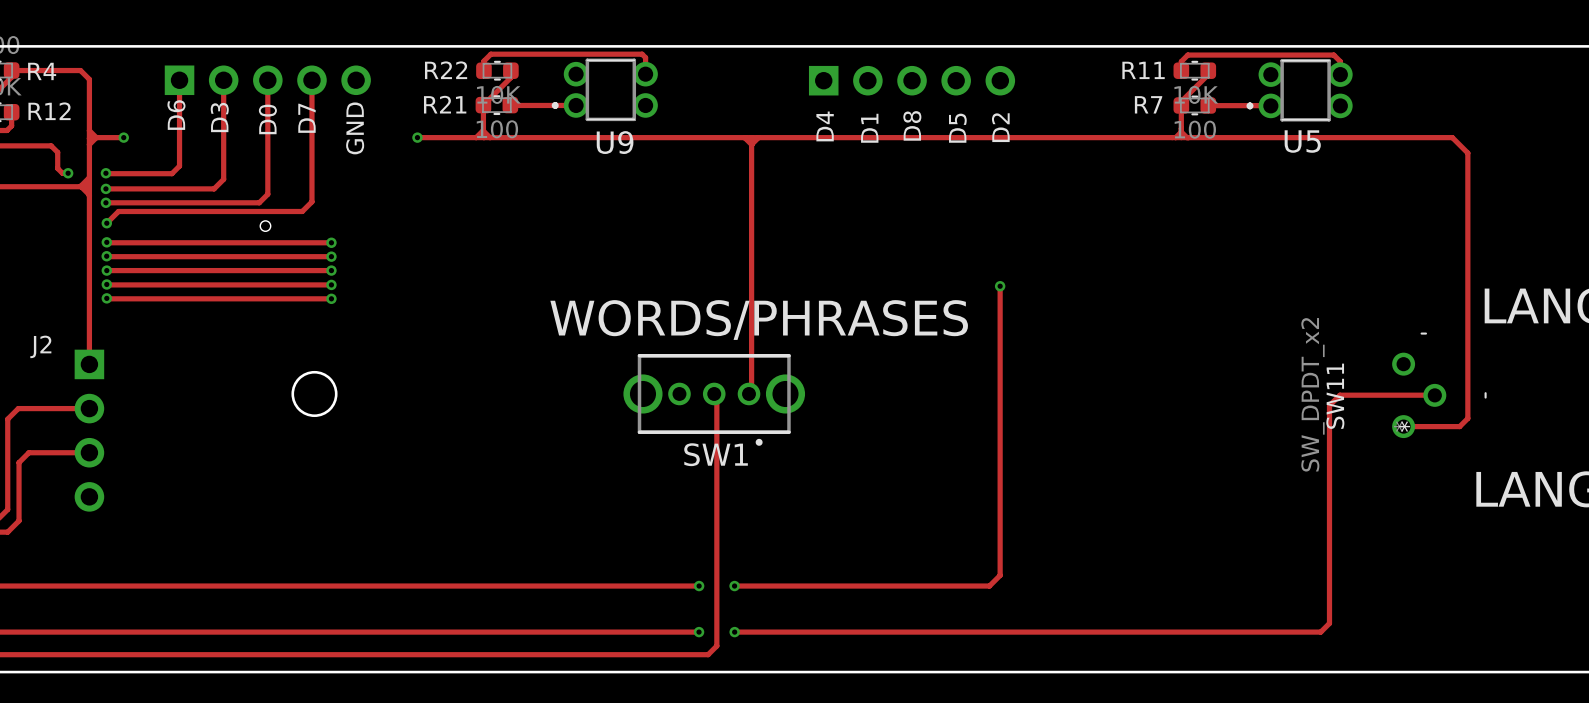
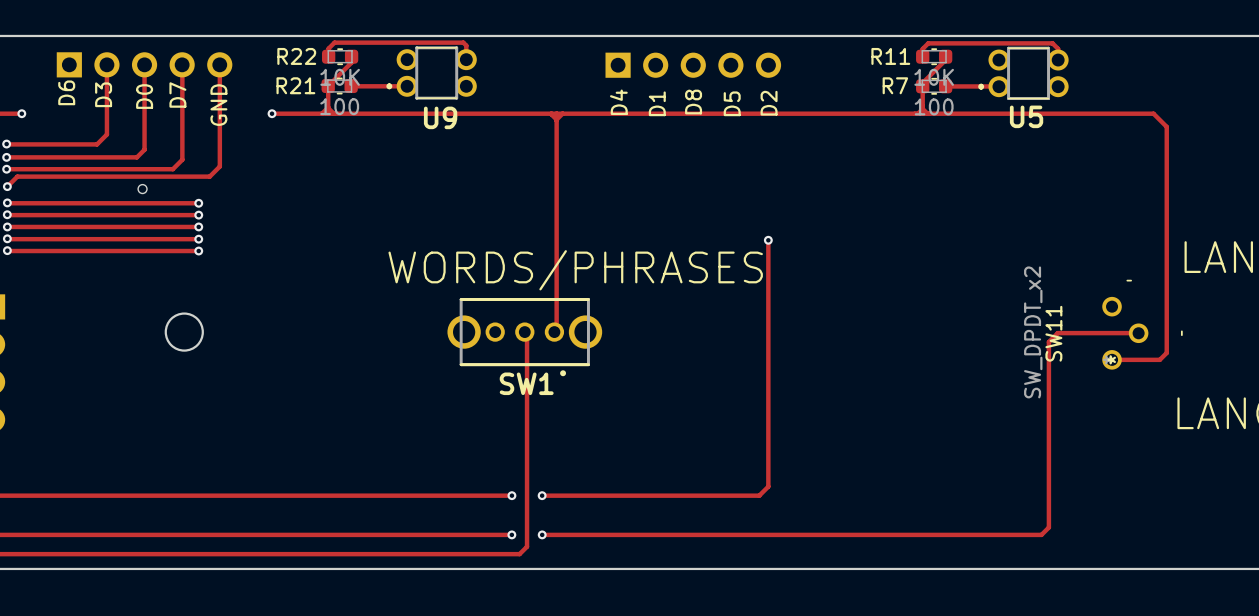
track: (179, 80) (179, 166) (171, 173) -> none
track: (311, 80) (311, 201) (302, 211) -> (182, 64) (182, 159) (172, 169) (137, 169)
track: none -> (219, 64) (219, 166) (209, 176) (173, 176)
track: (223, 162) (223, 179) (214, 188) -> (106, 134) (97, 144) (62, 144)
track: (267, 179) (267, 194) (259, 202) -> (144, 149) (136, 157) (98, 157)

